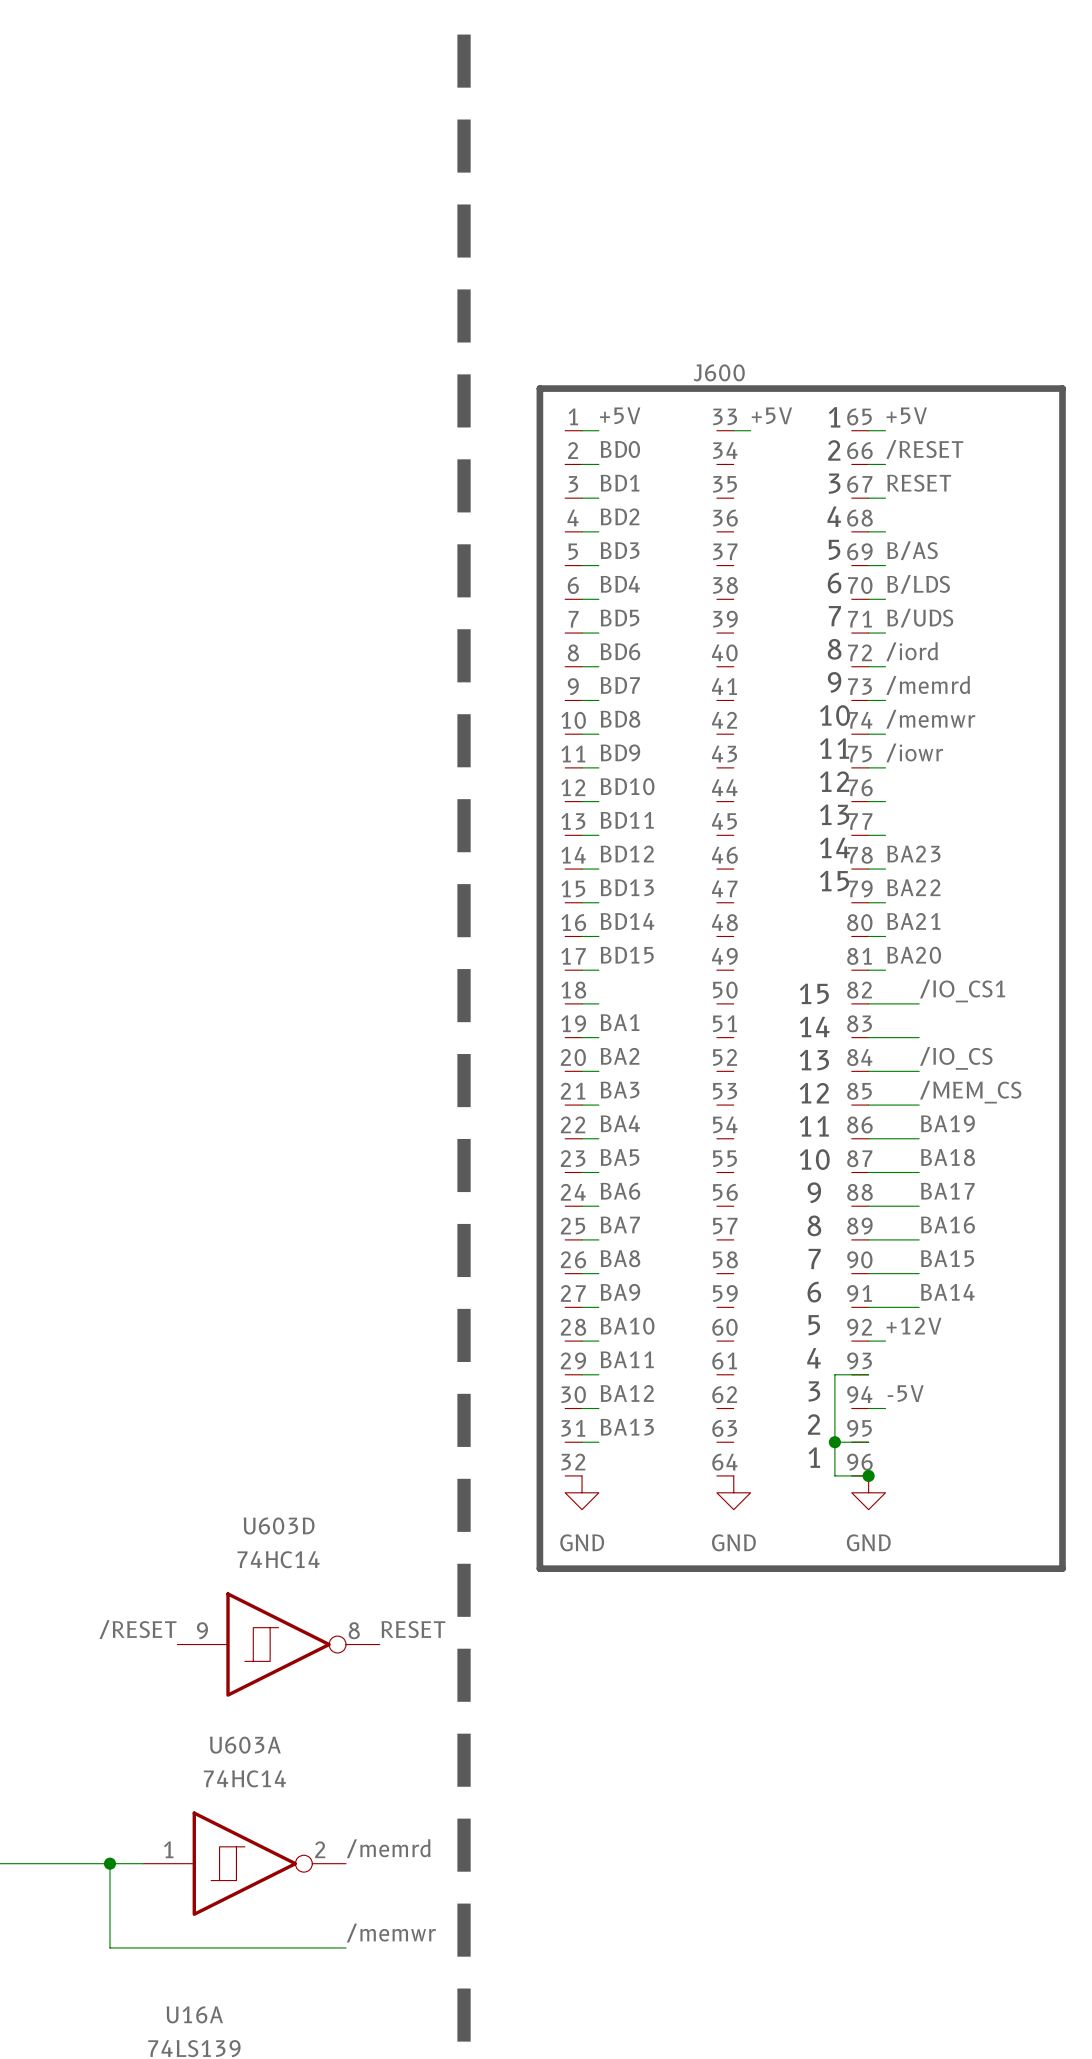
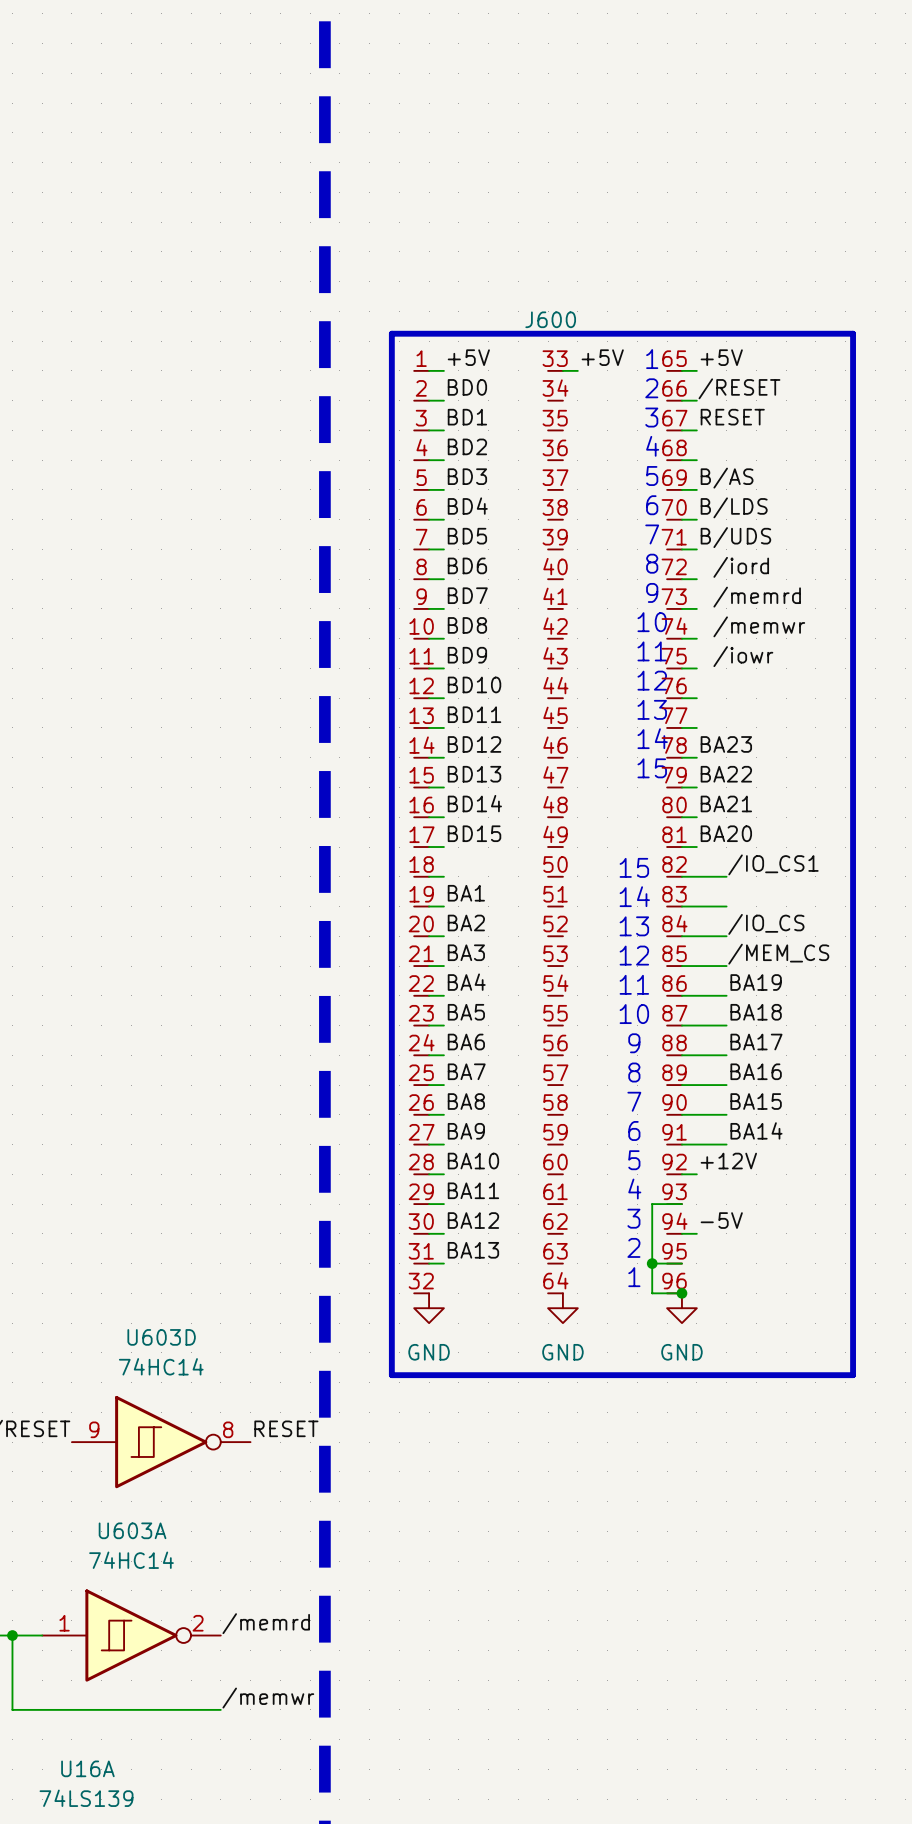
label position: /iord (912, 651) -> /iord (741, 567)
label position: /memrd (928, 685) -> /memrd (757, 597)
label position: /memwr (930, 719) -> /memwr (759, 626)
label position: /iowr (914, 752) -> /iowr (743, 656)

